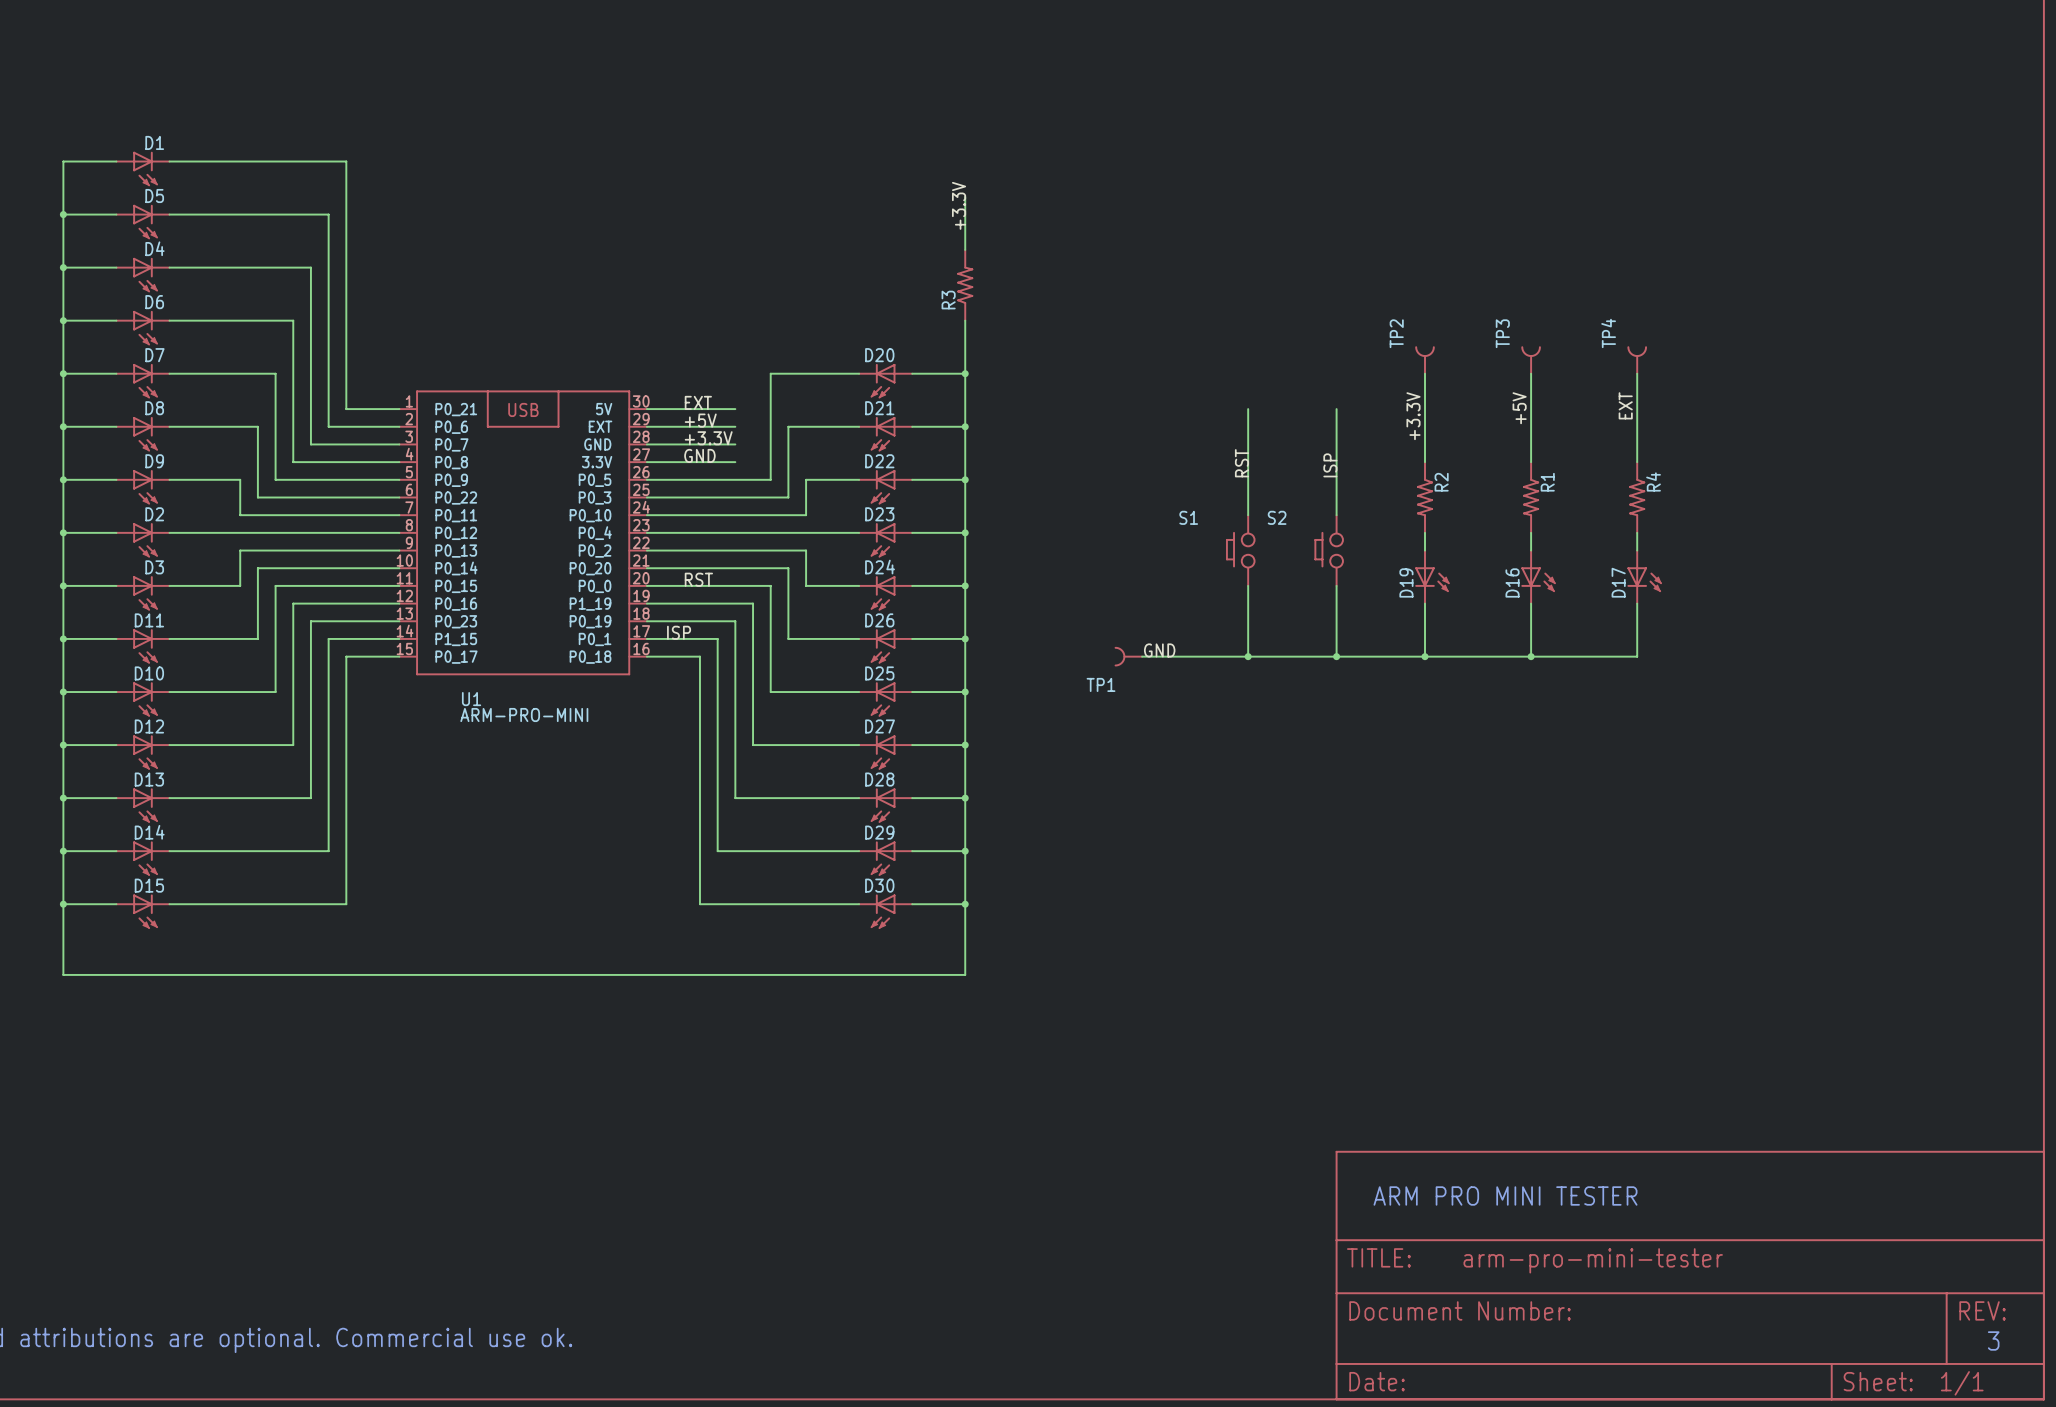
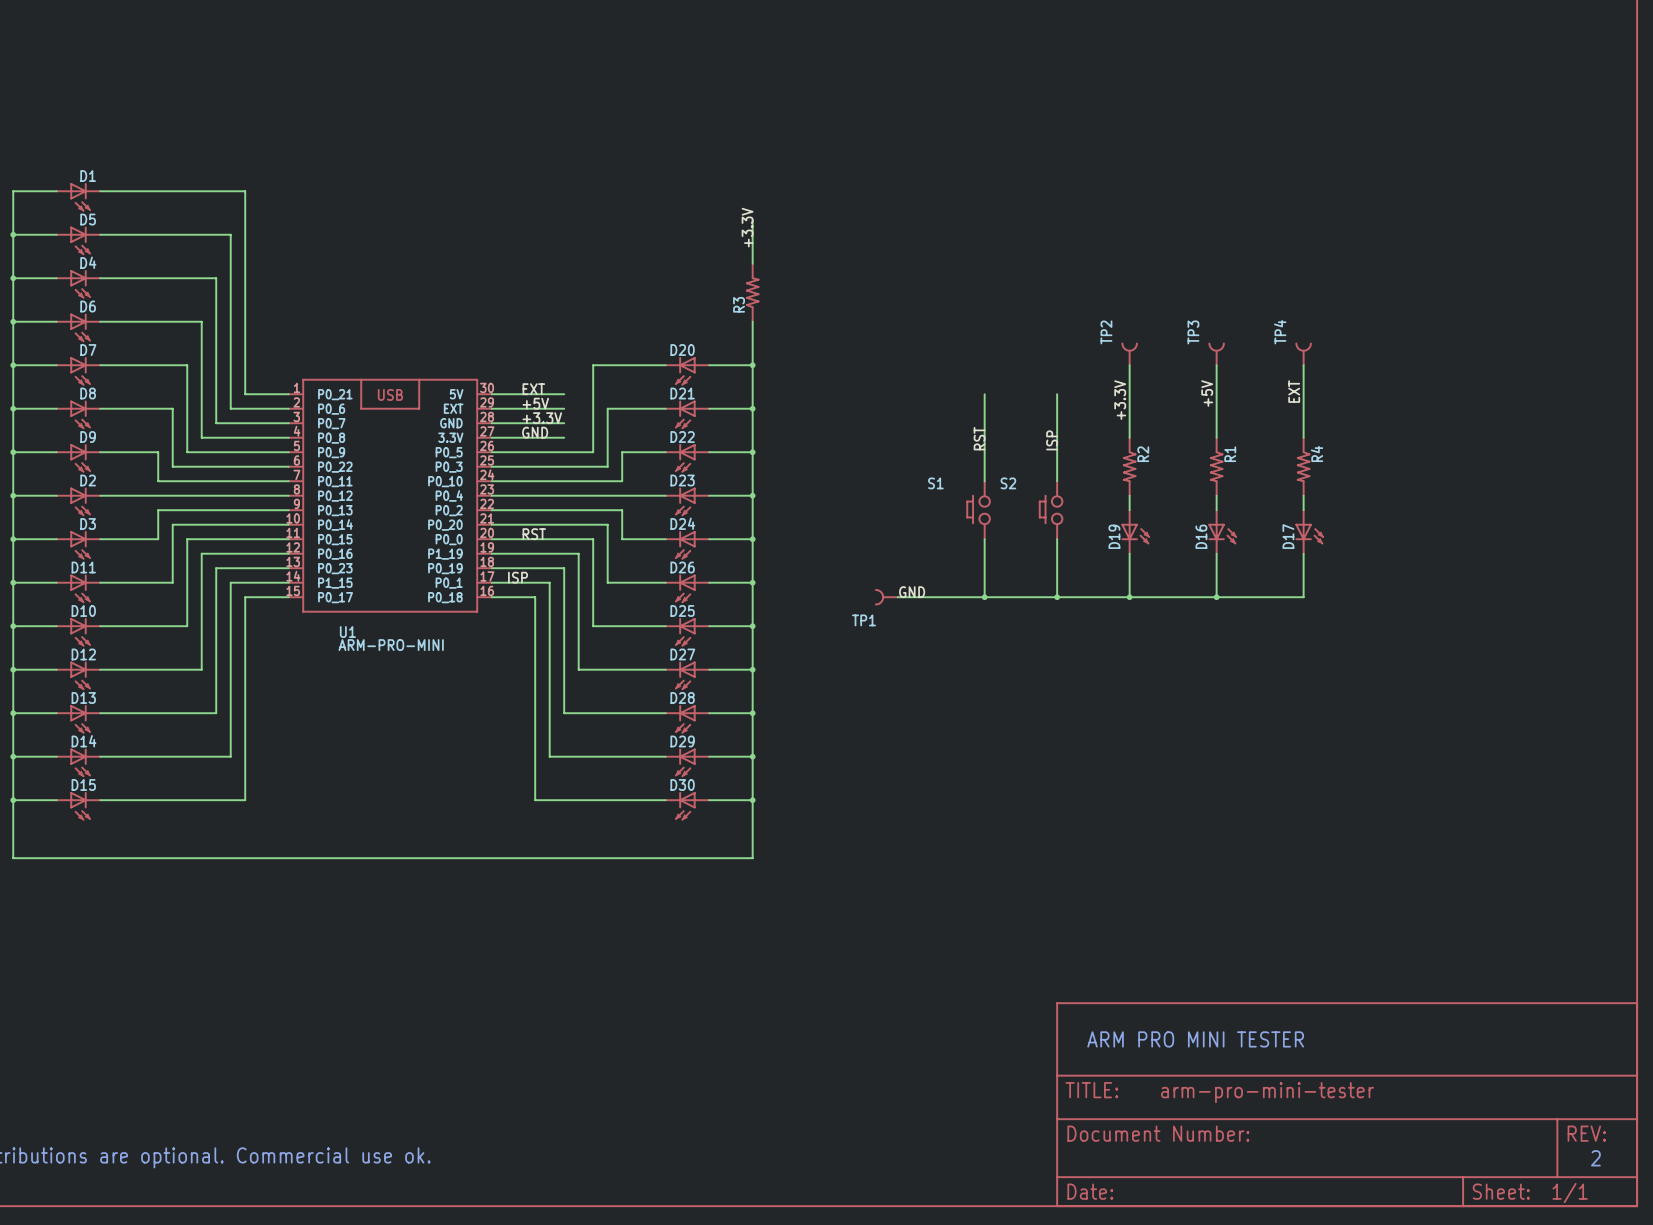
text: 3 (1993, 1340) -> 2 (1595, 1158)

